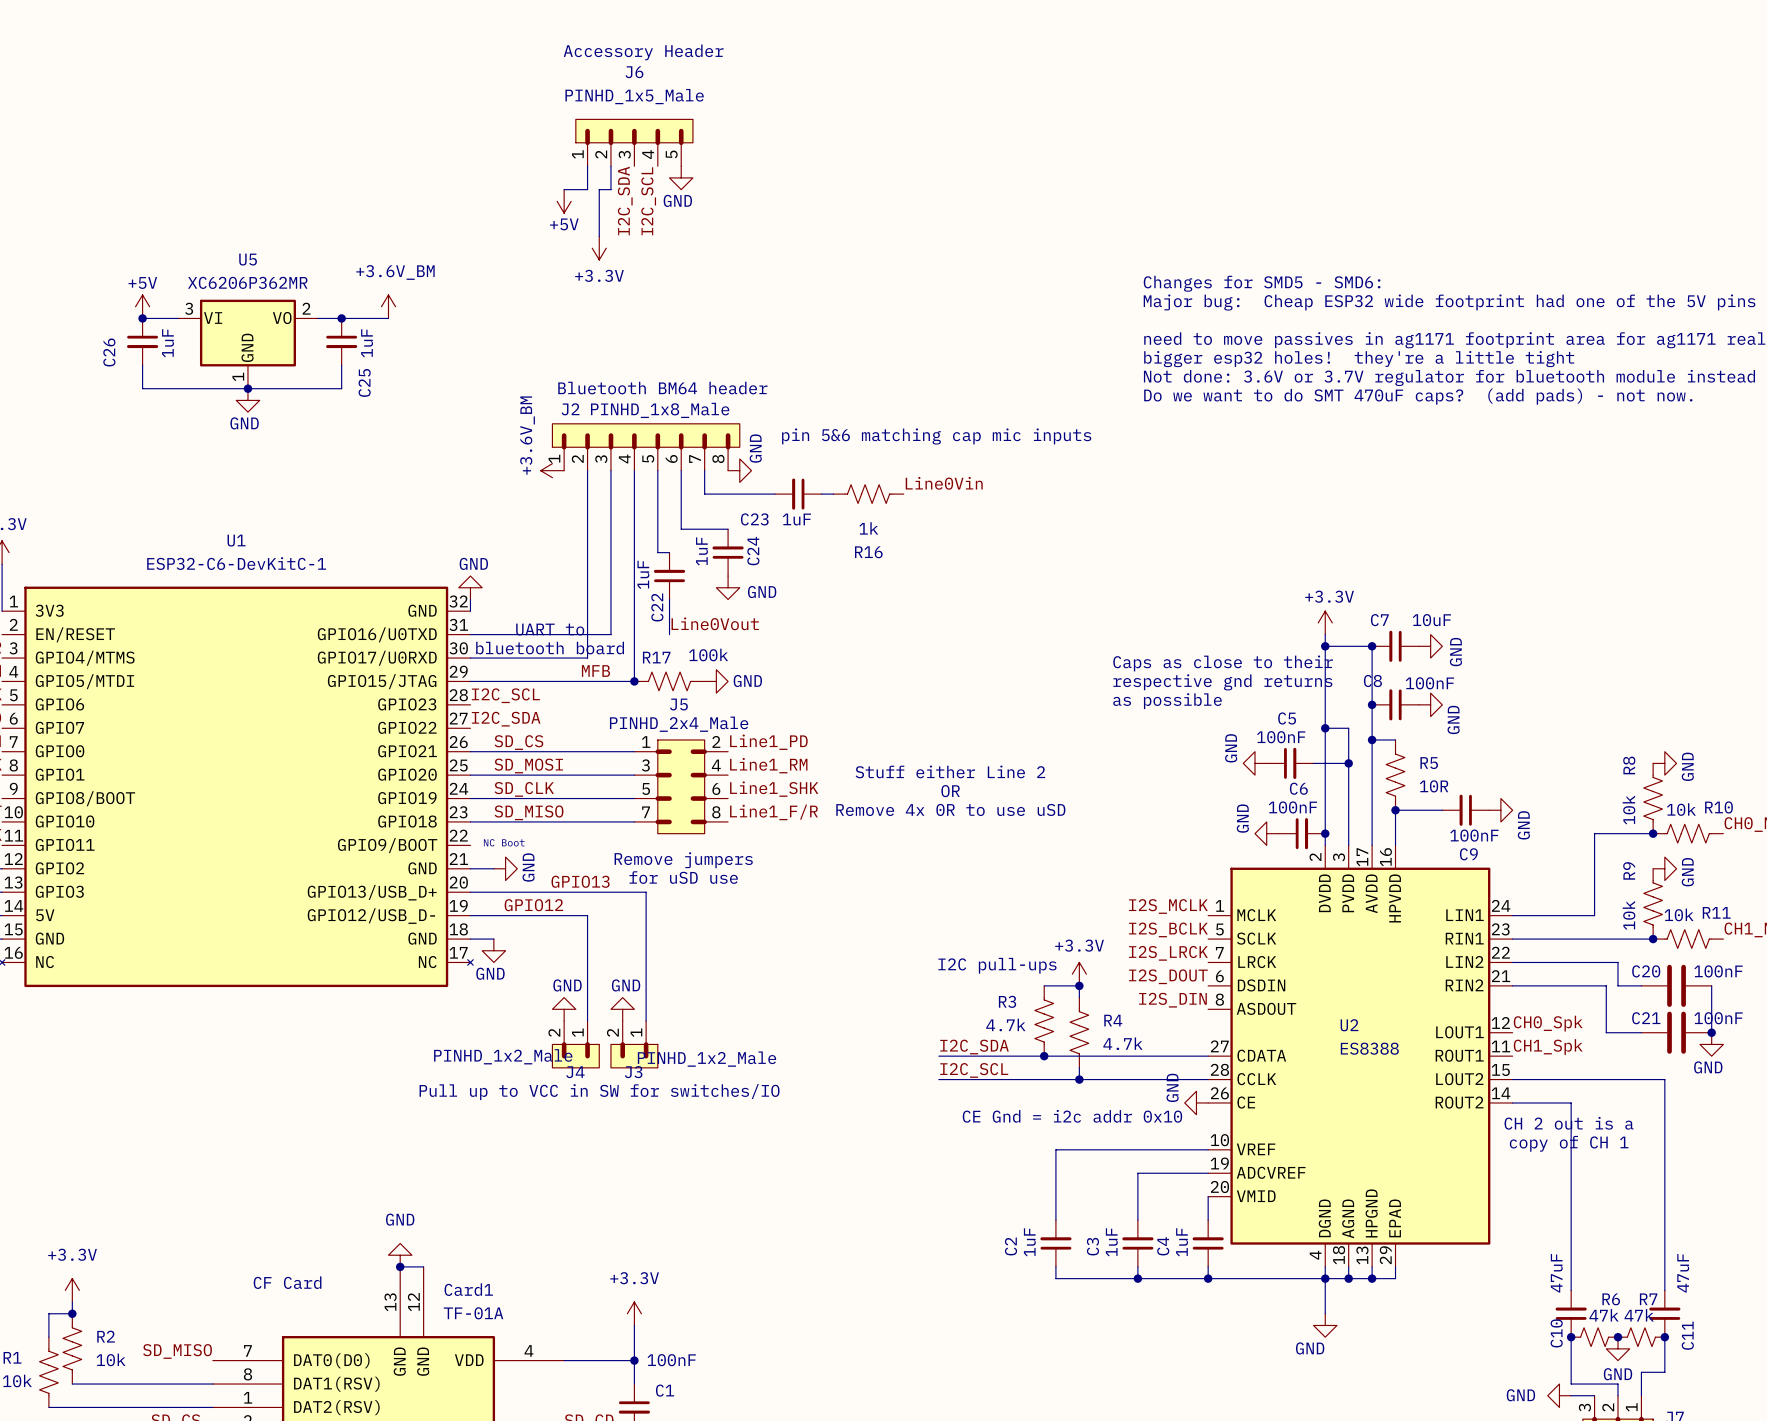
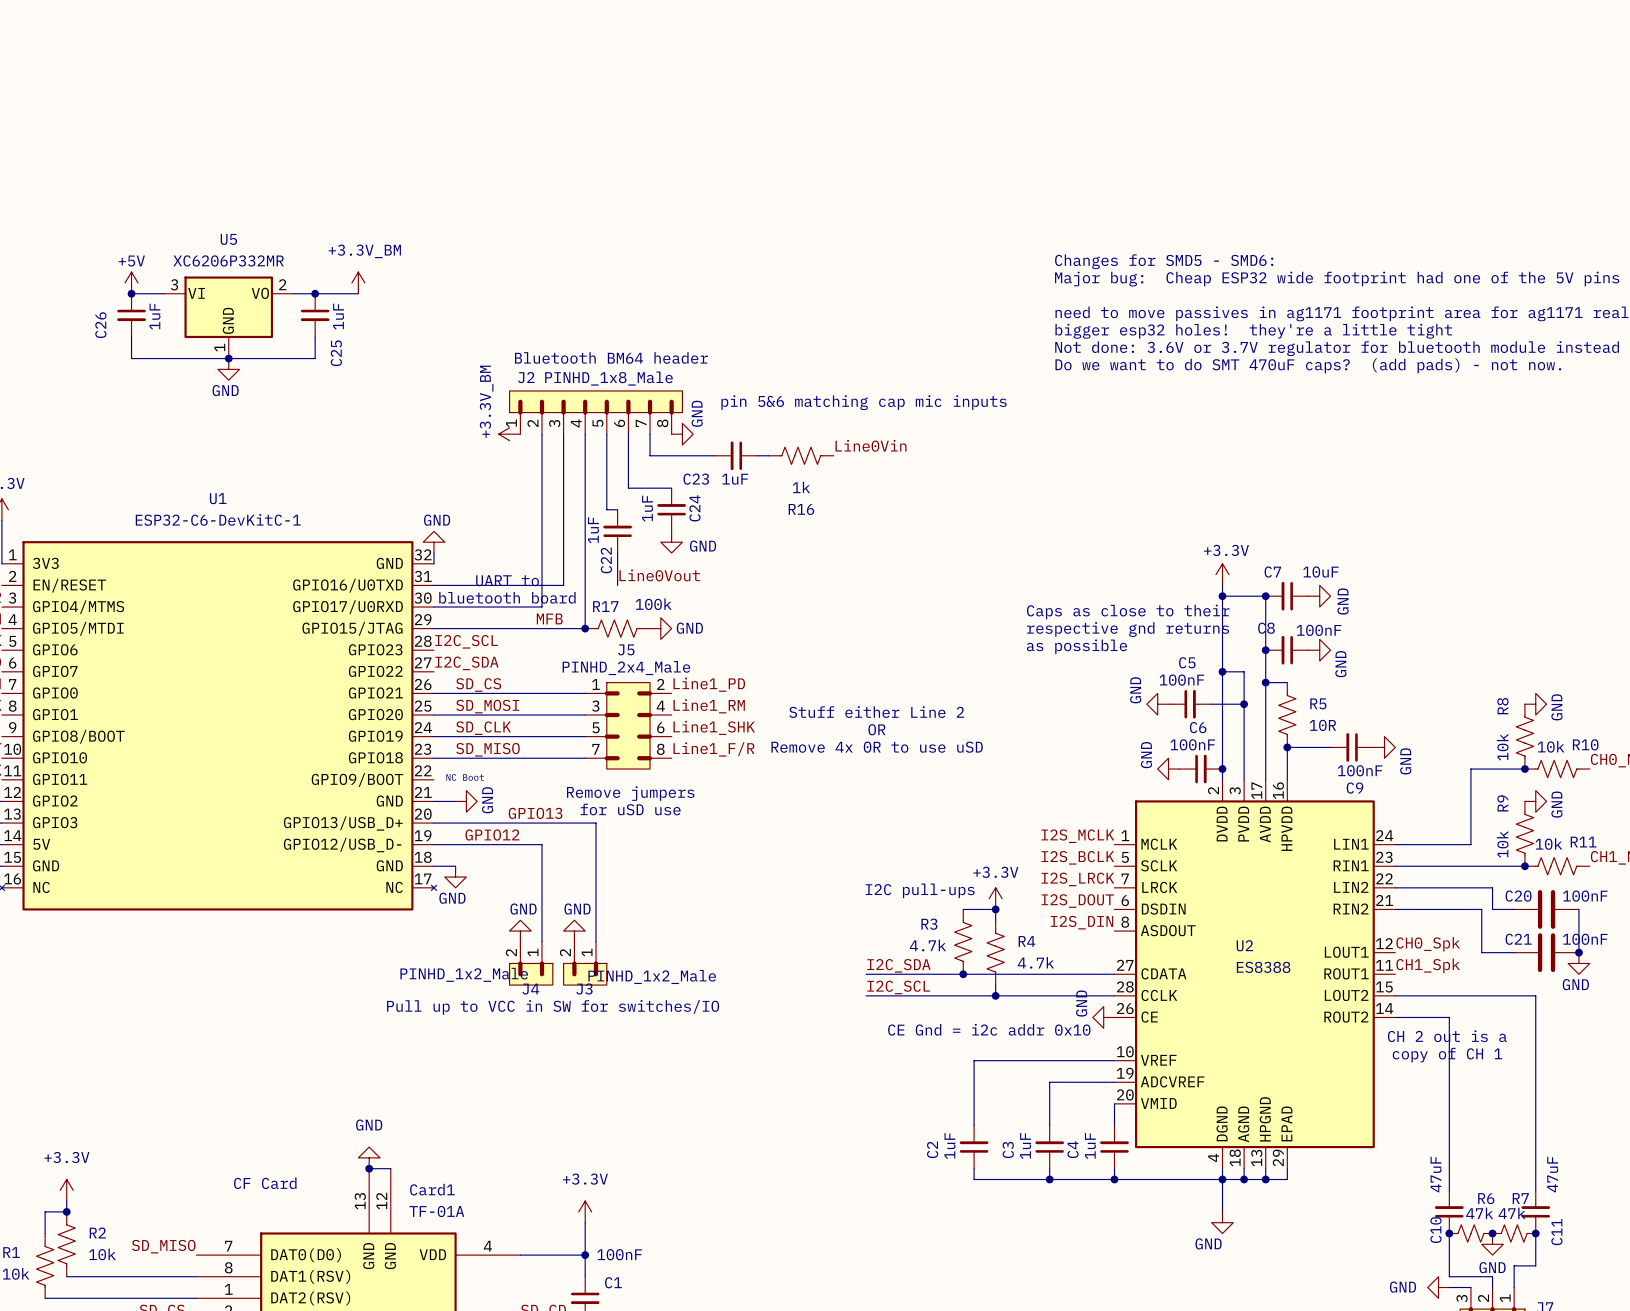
text: Accessory Header (643, 52) -> none
J6: PINHD_1x5_Male (634, 142) -> none
wire: (587, 166) (587, 189) (564, 189) -> none
wire: (610, 166) (610, 189) (599, 189) (599, 236) -> none
power symbol: GND (681, 177) -> none
label: I2C_SDA (625, 200) -> none
power symbol: +5V (564, 201) -> none
label: I2C_SCL (648, 201) -> none
power symbol: +3.3V (599, 248) -> none
U5 value: XC6206P362MR (247, 282) -> XC6206P332MR (228, 260)
power symbol: +3.6V_BM (388, 306) -> +3.3V_BM (358, 282)
power symbol: +3.6V_BM (552, 470) -> +3.3V_BM (509, 434)

